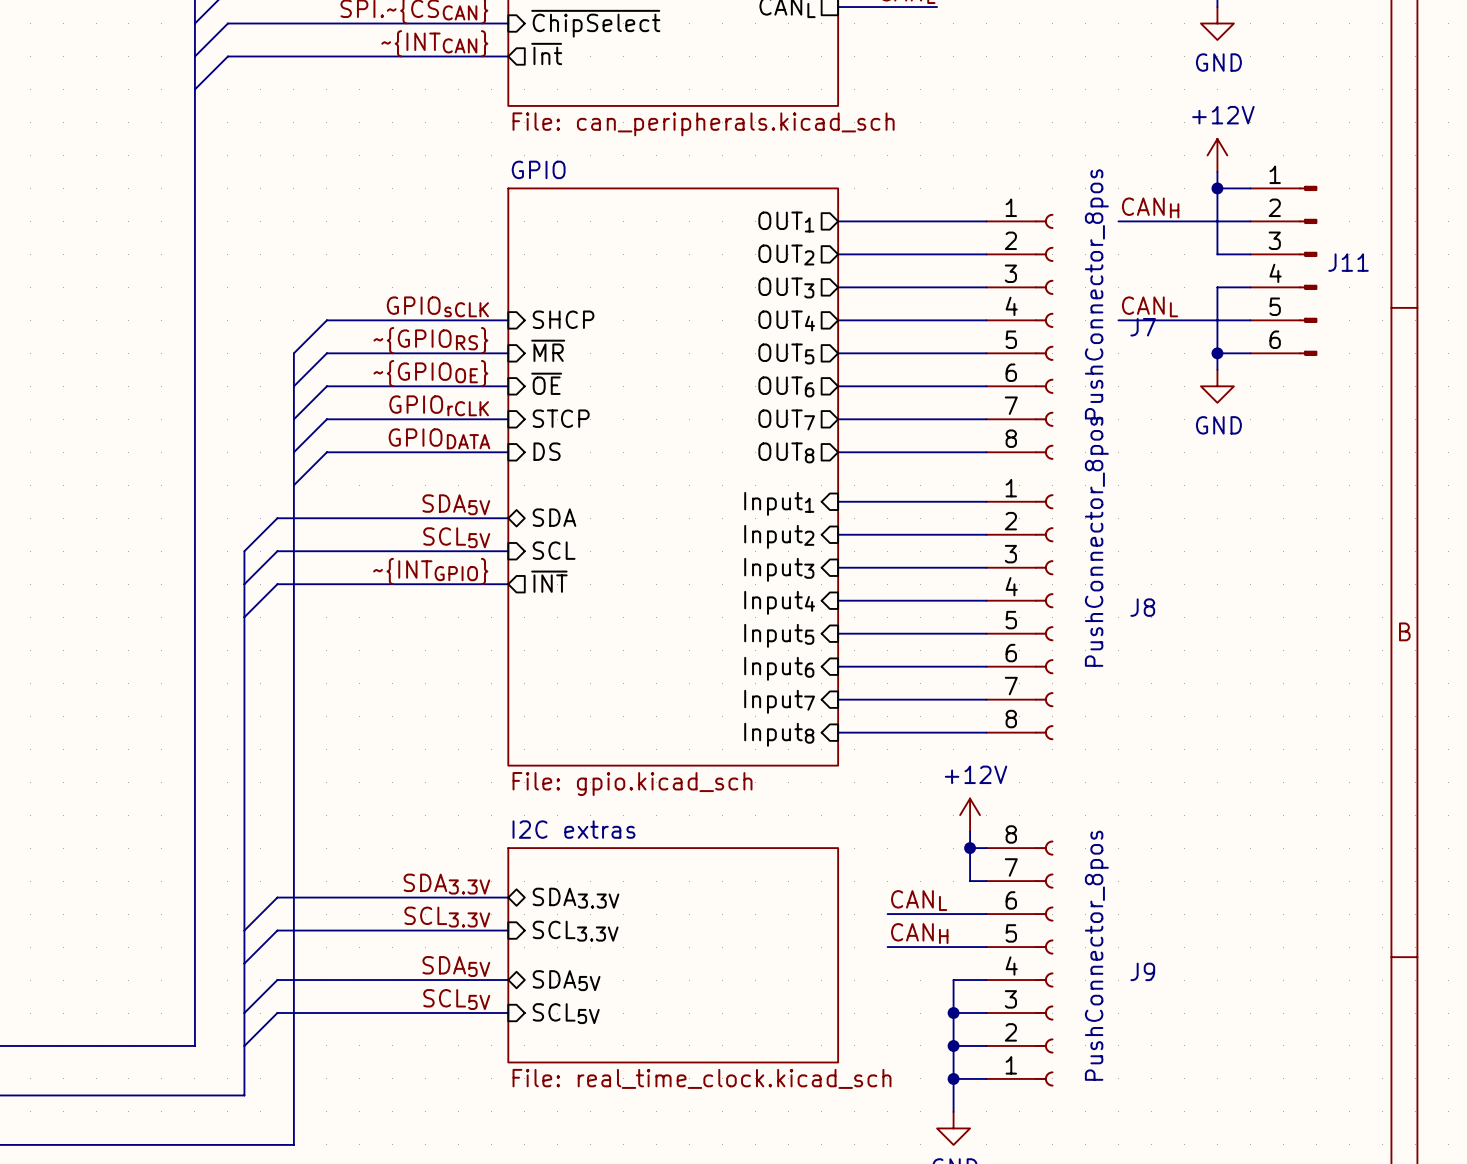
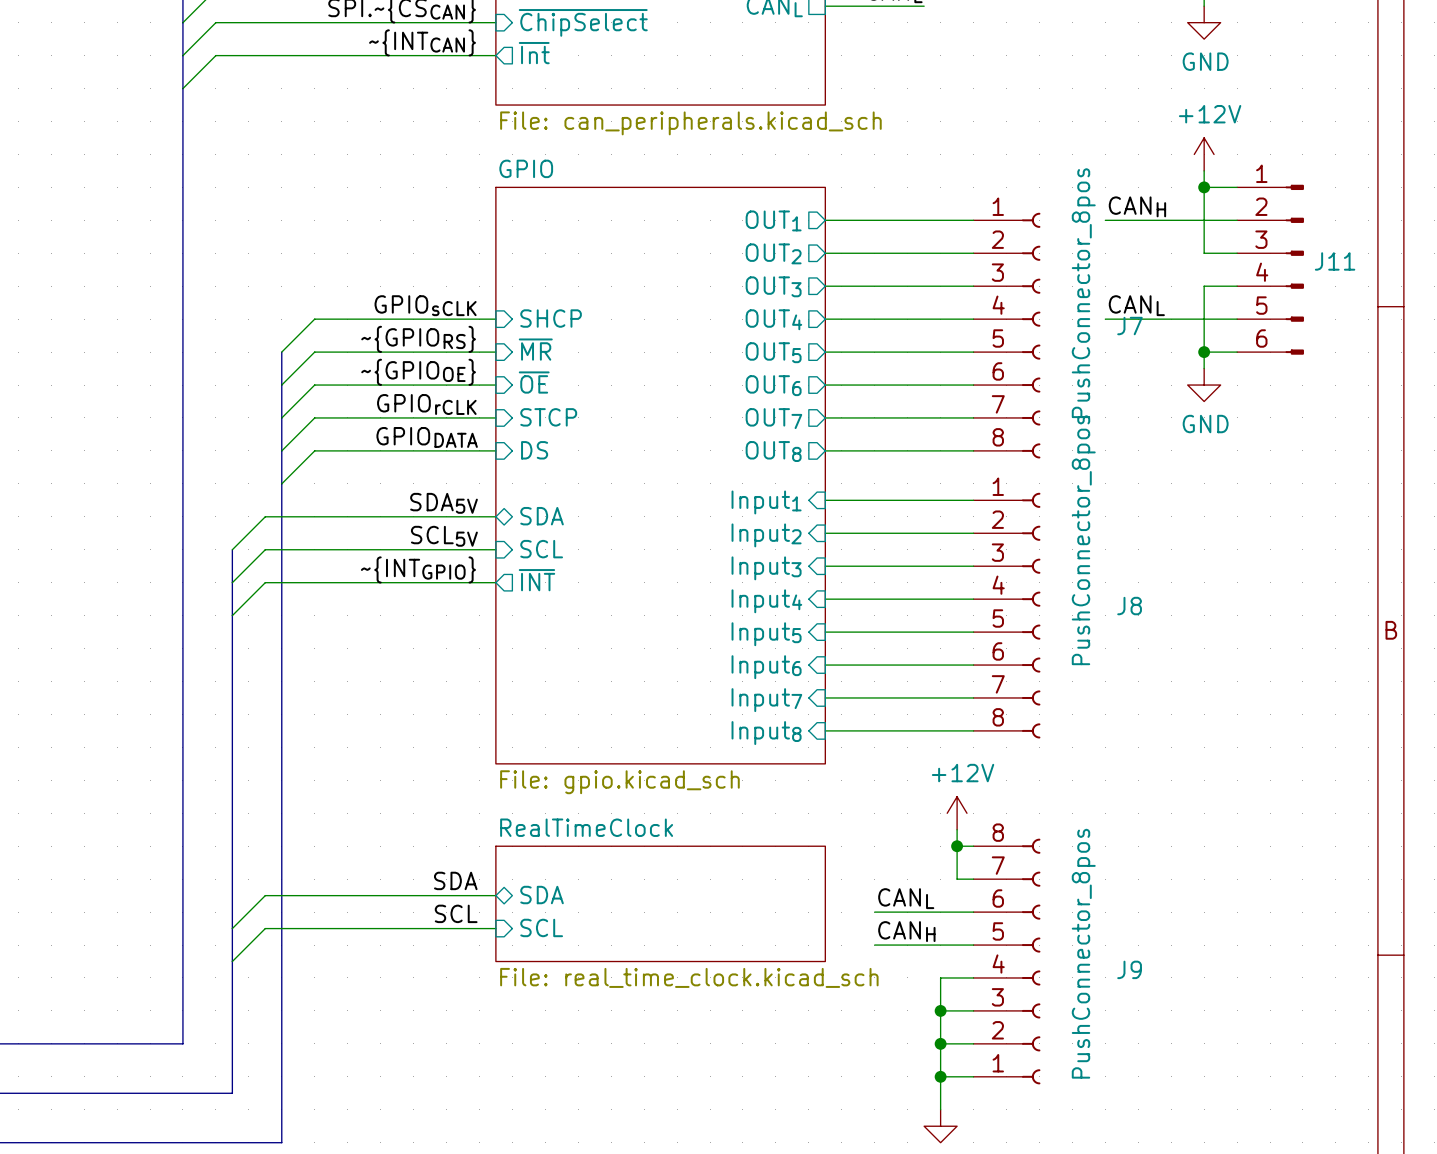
label: SDA3.3V (446, 884) -> SDA (455, 880)
sheet pin: SDA3.3V (576, 898) -> SDA (542, 895)
sheet RealTimeClock: none -> File: real_time_clock.kicad_sch (660, 903)
label: SCL3.3V (447, 917) -> SCL (456, 913)
sheet pin: SCL3.3V (575, 931) -> SCL (541, 927)
sheet I2C extras: File: real_time_clock.kicad_sch (673, 955) -> none
label: SDA5V (456, 966) -> none
wire: (508, 980) (277, 980) (244, 1013) -> none
sheet pin: SDA5V (566, 980) -> none
label: SCL5V (456, 999) -> none
wire: (508, 1013) (277, 1013) (244, 1045) -> none
sheet pin: SCL5V (566, 1013) -> none

